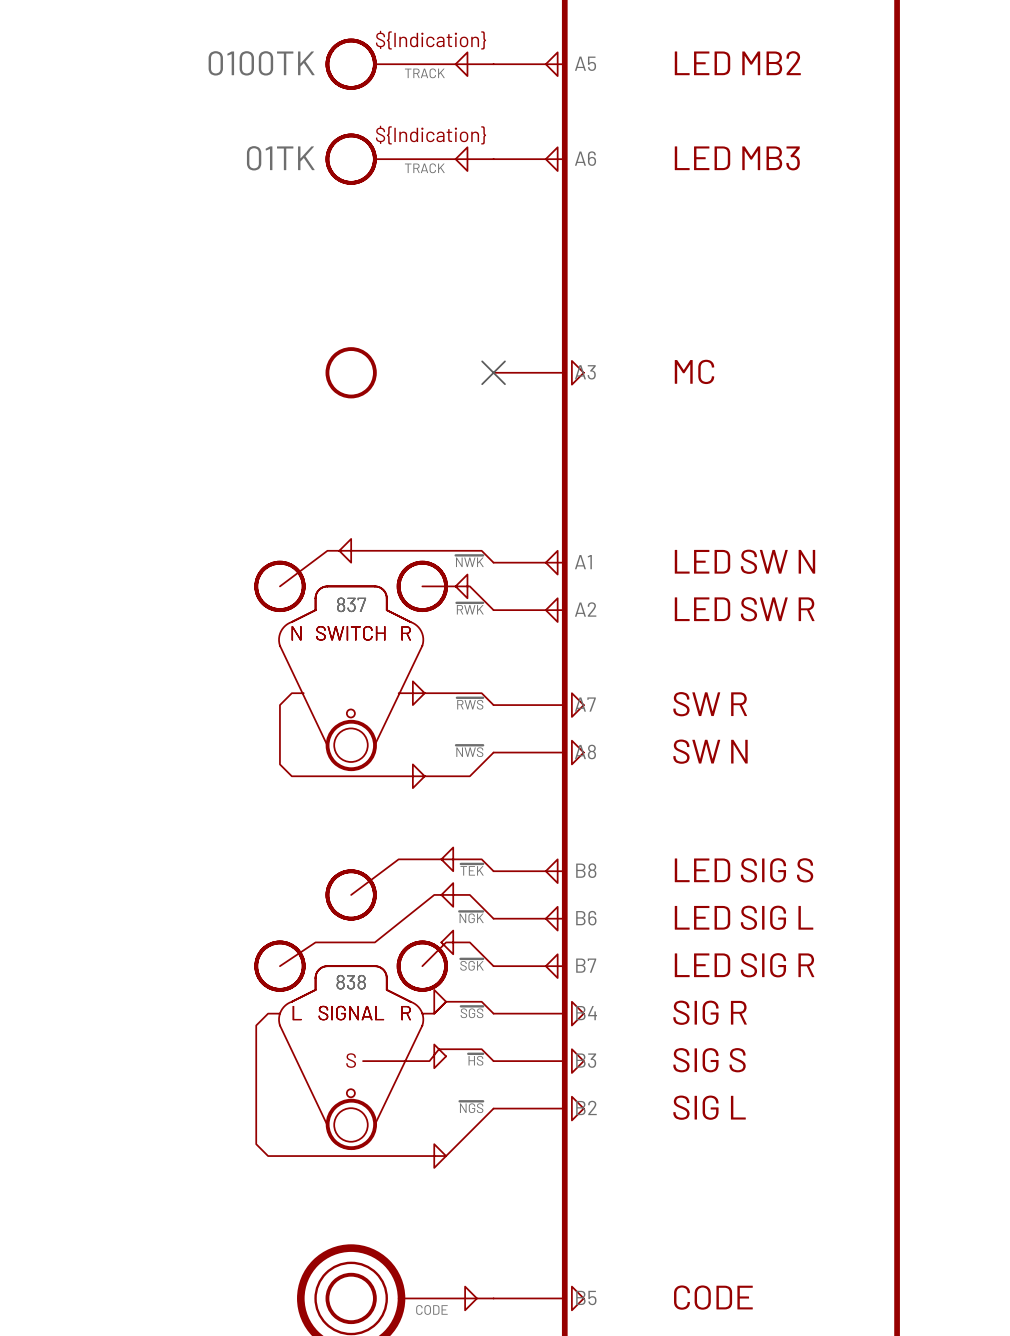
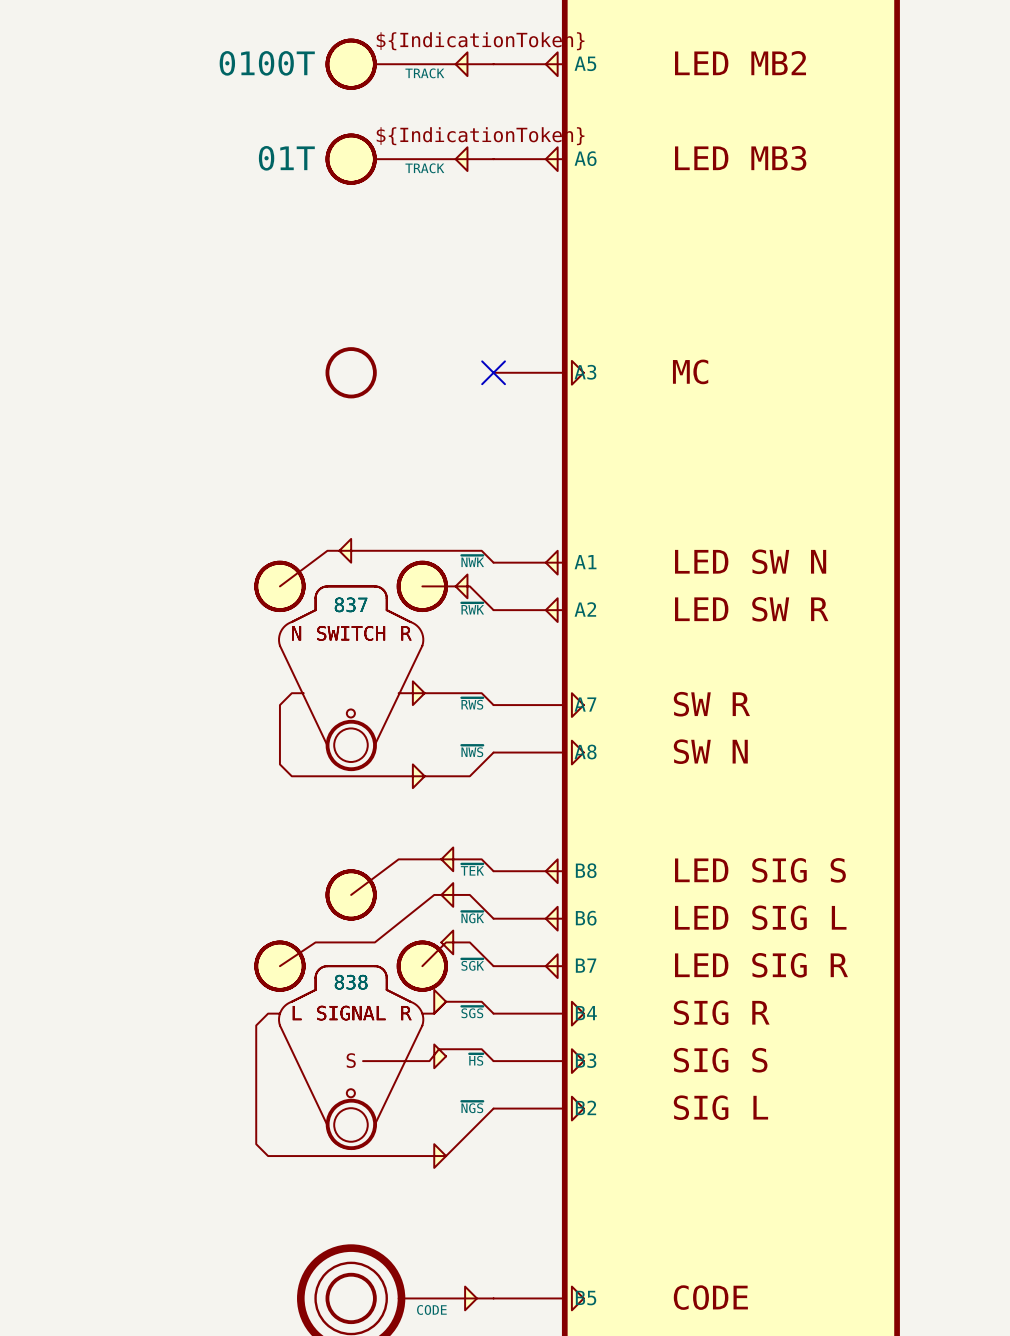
part text: ${Indication} (431, 40) -> ${IndicationToken} (480, 41)
part text: 0100TK (261, 63) -> none
part text: none -> 0100T (267, 63)
part text: ${Indication} (431, 135) -> ${IndicationToken} (480, 136)
part text: 01TK (280, 158) -> none
part text: none -> 01T (286, 158)

